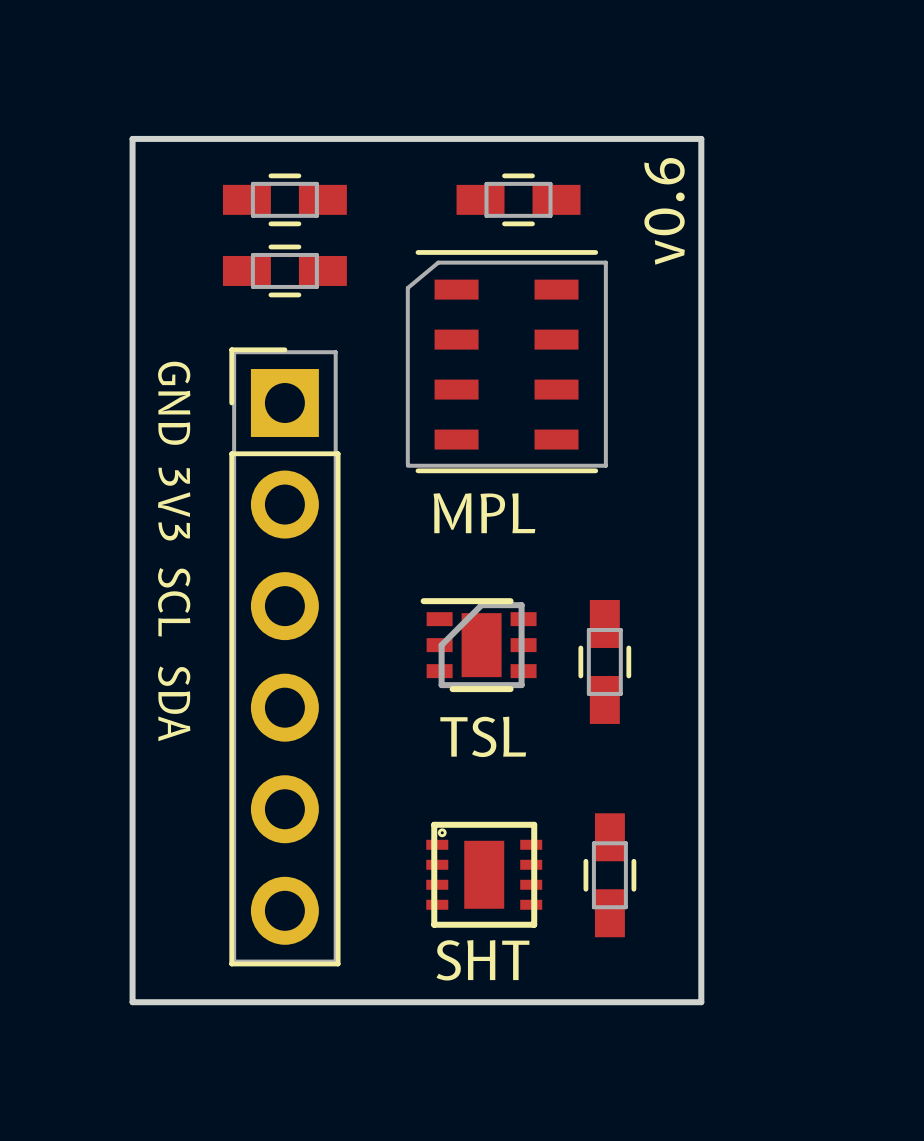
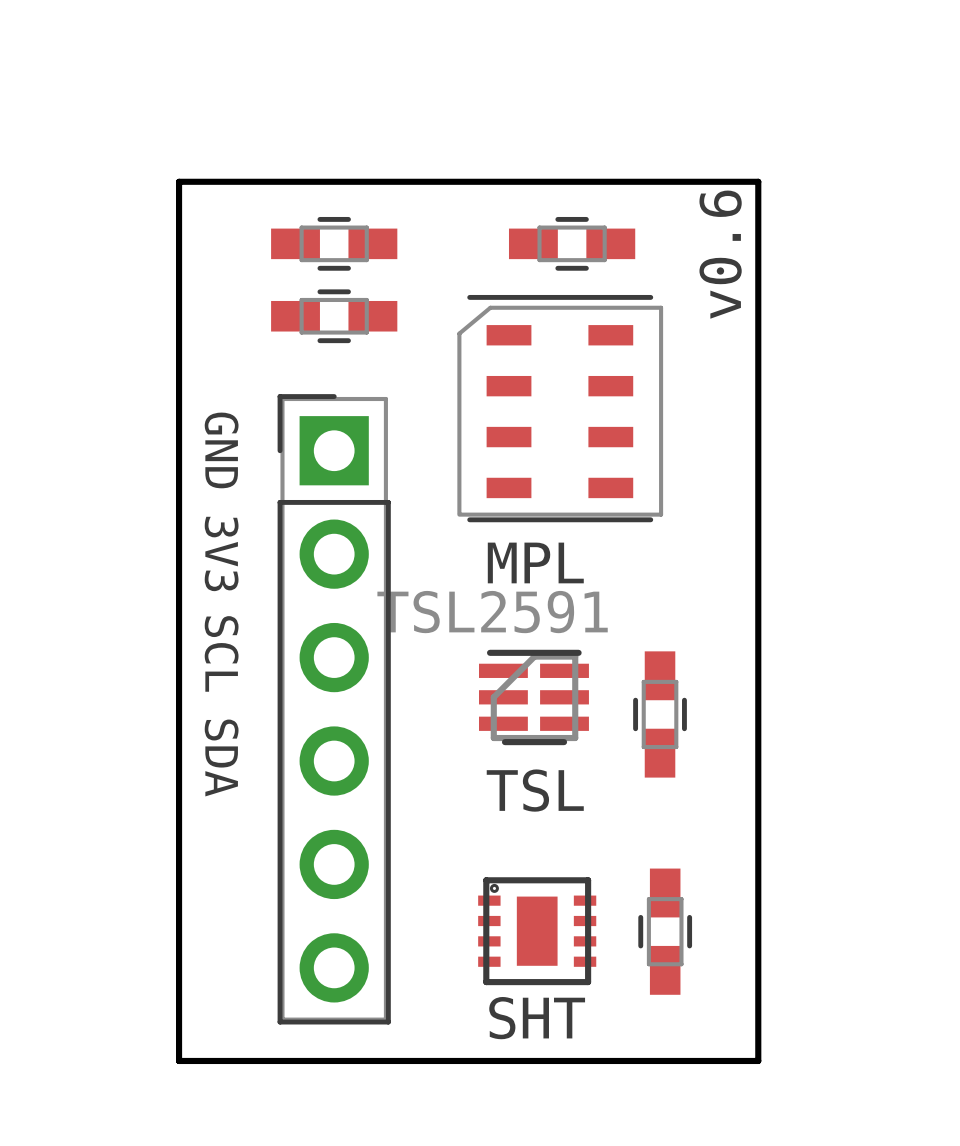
part value: none -> TSL2591 (492, 612)
part footprint: [420, 598, 537, 693] -> [478, 649, 589, 746]

